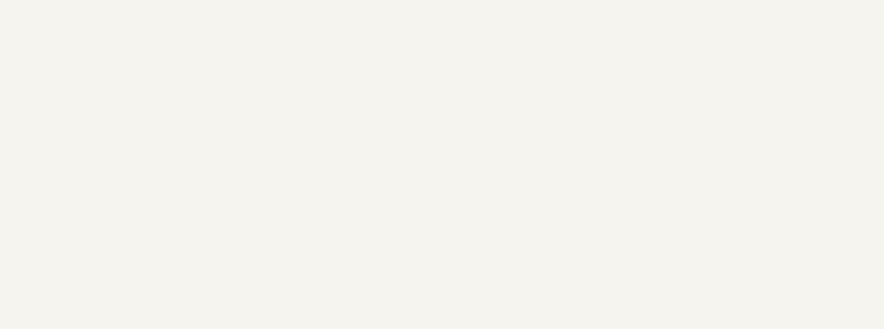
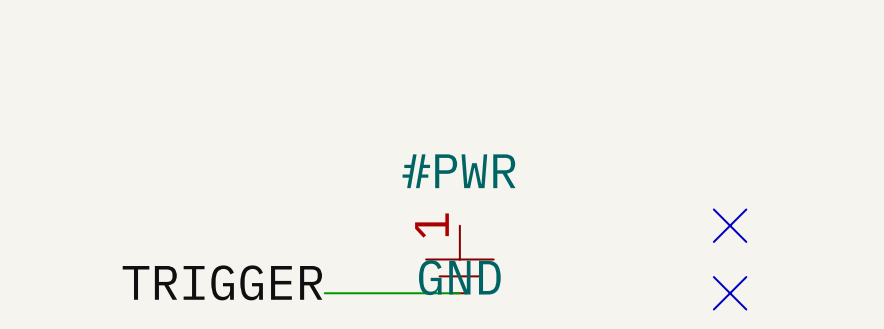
no-connect mark: none -> (730, 225)
#PWR: none -> GND (459, 259)
label: none -> TRIGGER (222, 282)
wire: none -> (324, 293) (459, 293)
no-connect mark: none -> (730, 293)

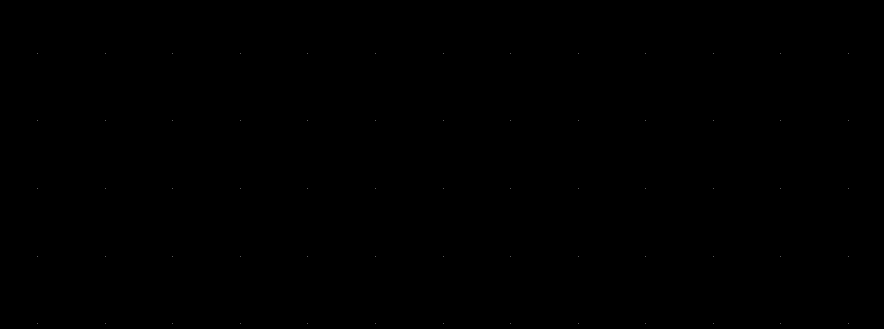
no-connect mark: (730, 225) -> none
#PWR: GND (459, 259) -> none
label: TRIGGER (222, 282) -> none
wire: (324, 293) (459, 293) -> none
no-connect mark: (730, 293) -> none

